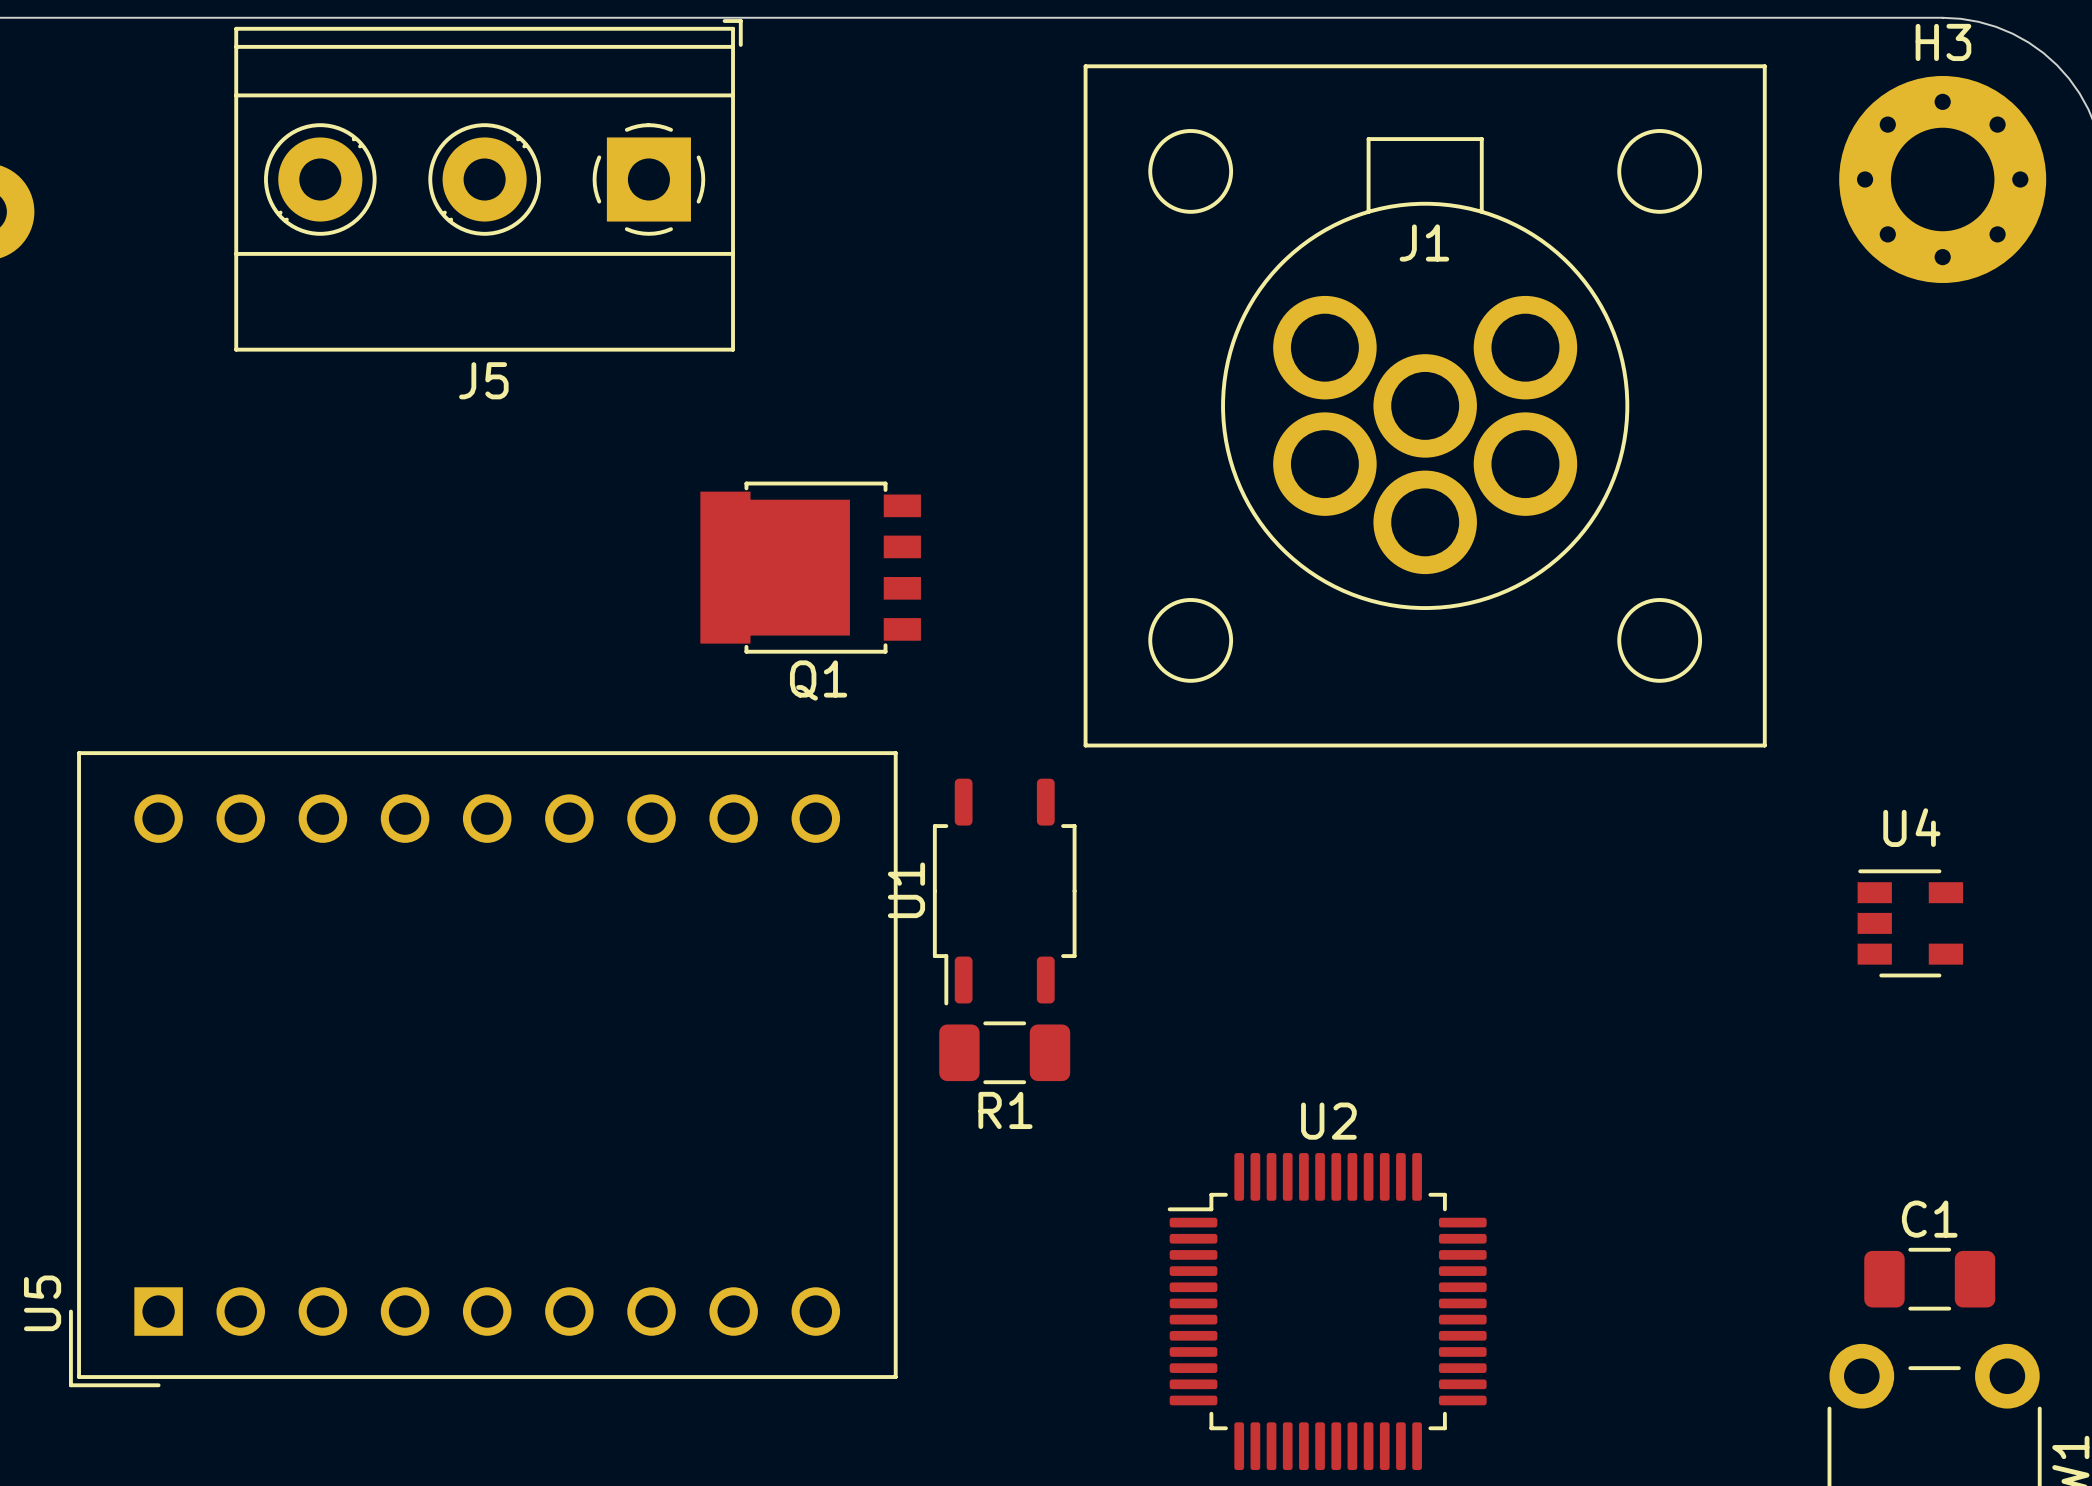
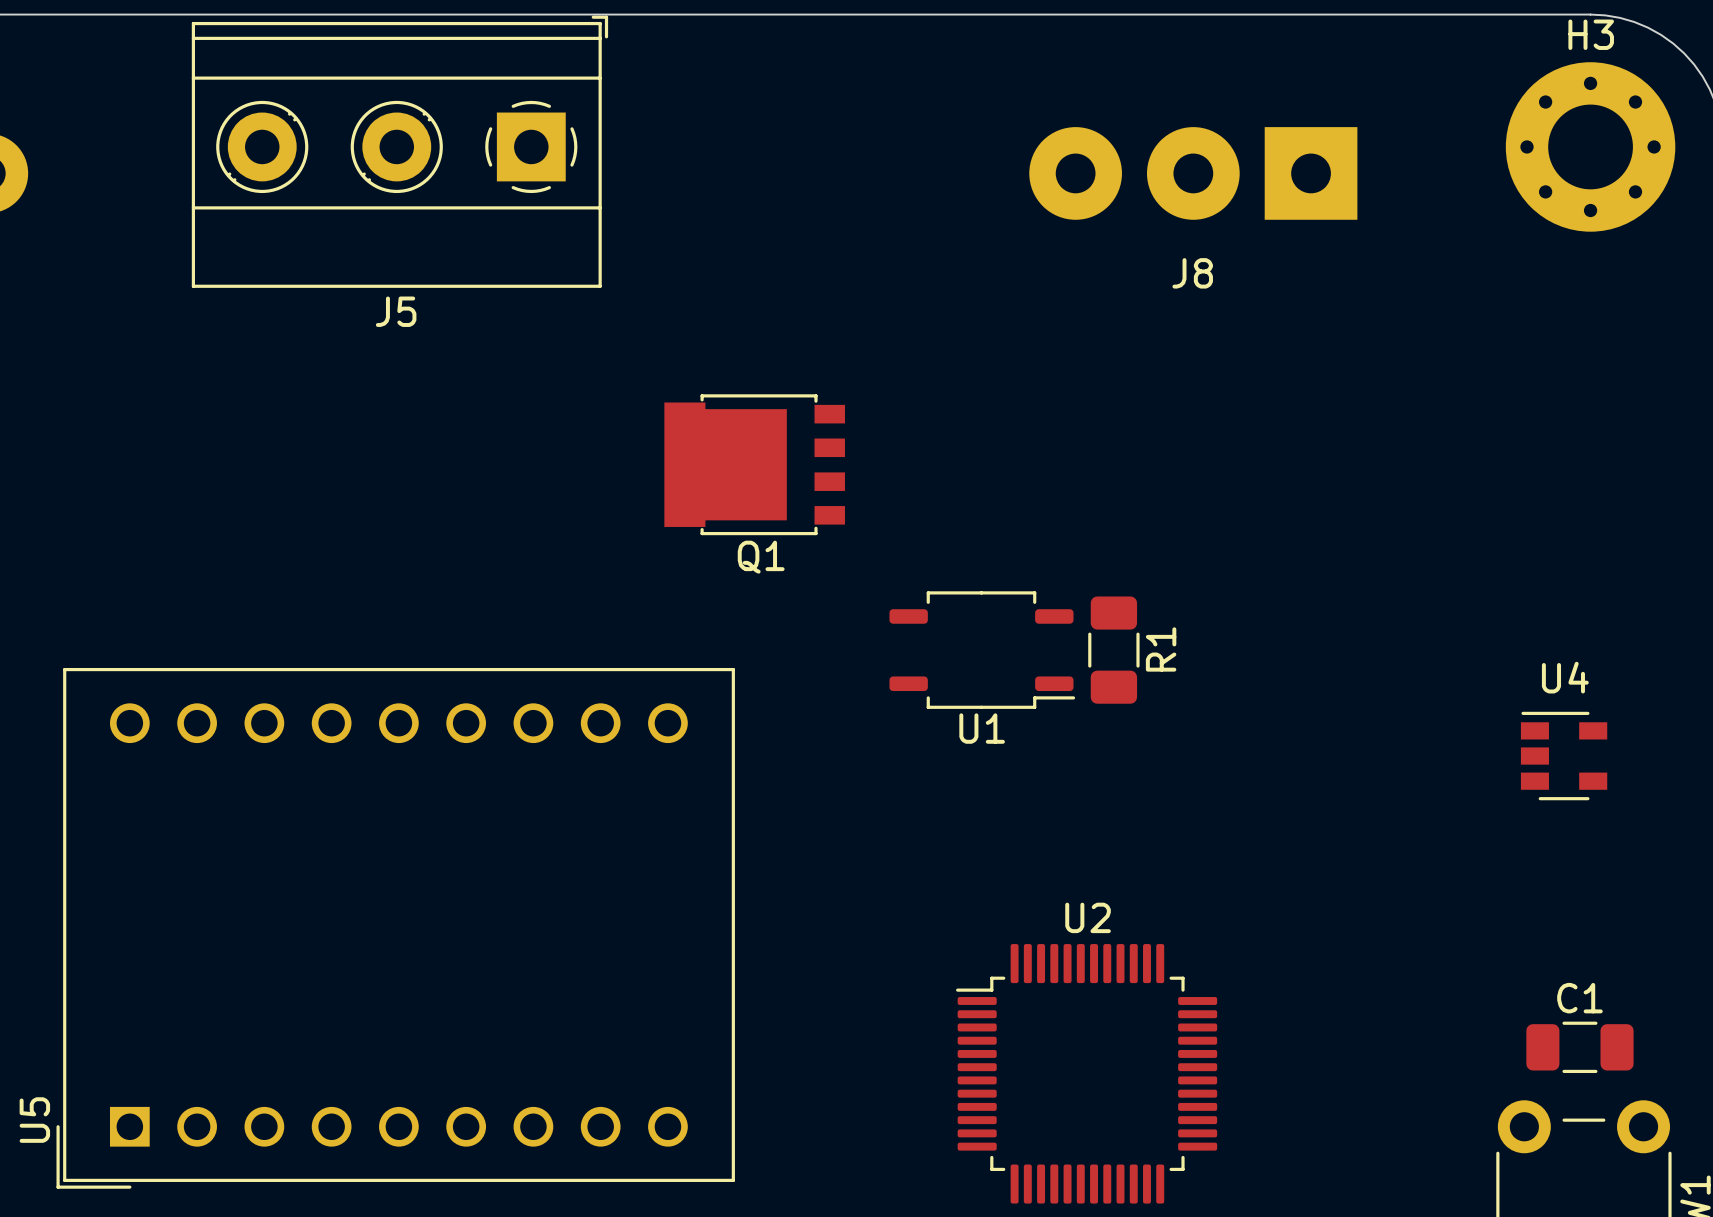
J8: none -> (1193, 173)
J1: (1425, 405) -> none
Q1 position: (810, 567) -> (754, 464)
U1 rotation: 0° (1004, 892) -> 90° counterclockwise (982, 650)
U1 position: (1004, 892) -> (982, 650)
R1 rotation: 0° (1004, 1052) -> 90° clockwise (1113, 650)
R1 position: (1004, 1052) -> (1113, 650)
U5 position: (483, 1069) -> (395, 928)
R1 name position: R1 (1005, 1110) -> R1 (1161, 649)

